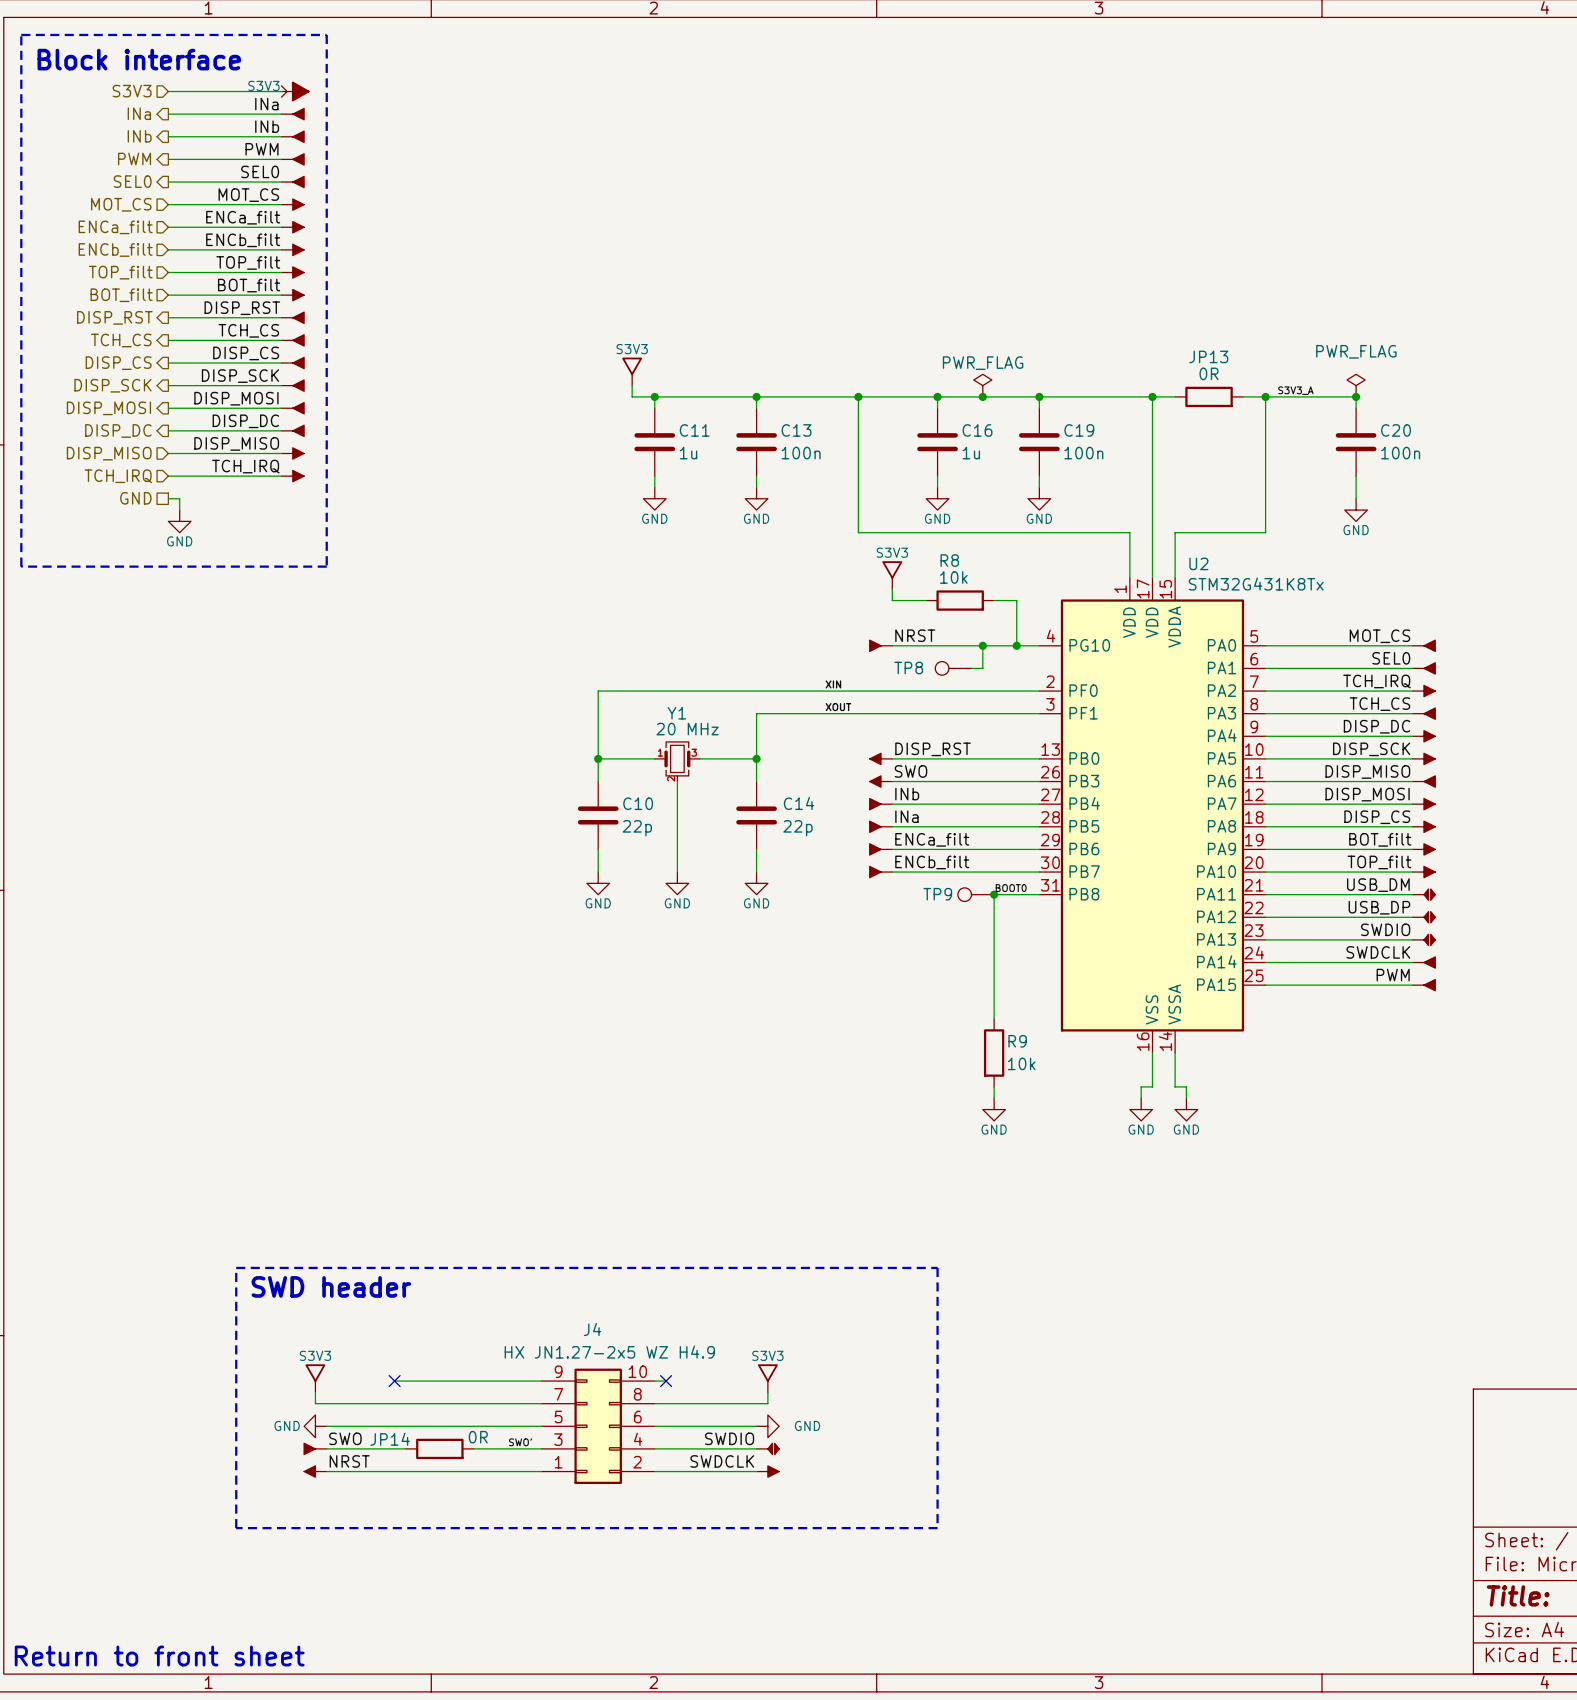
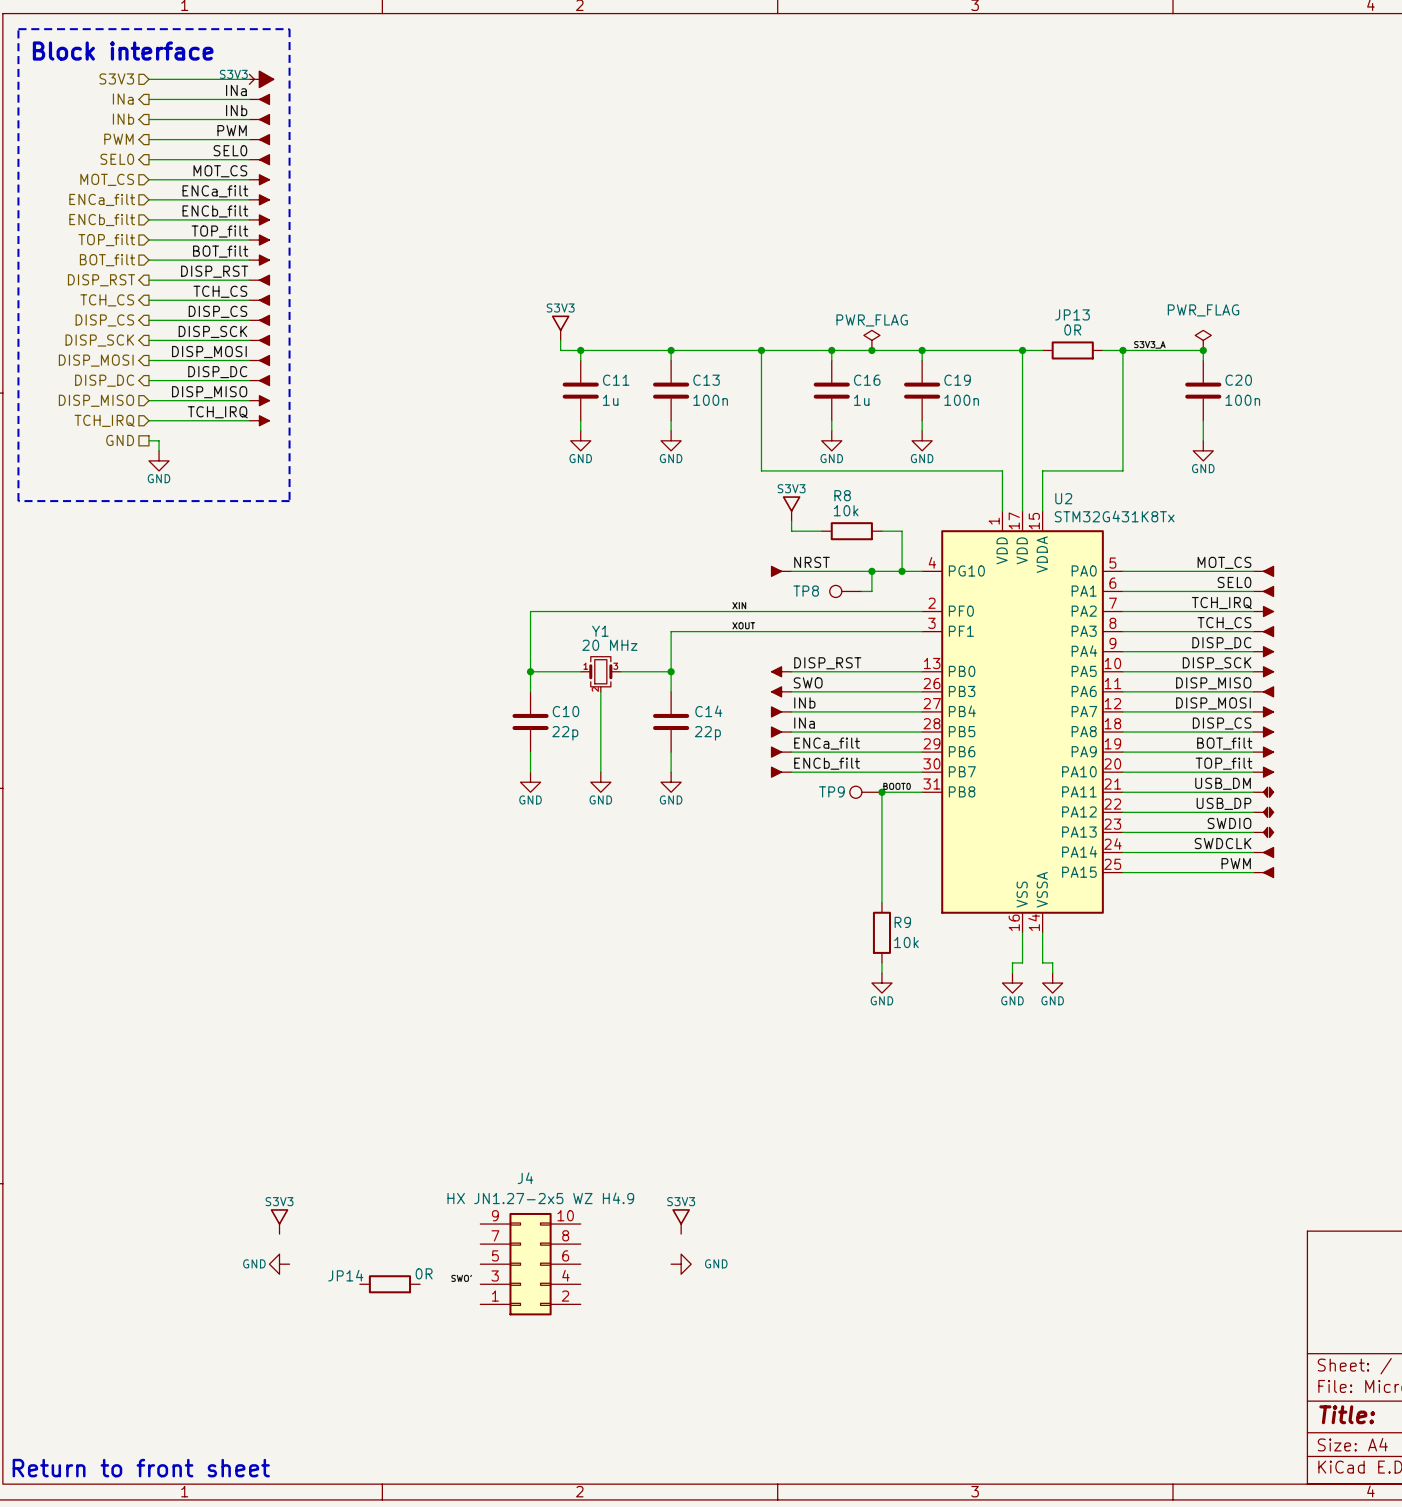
line: (236, 1267) (937, 1267) (937, 1528) (236, 1528) (236, 1267) -> none
text: SWD header (331, 1286) -> none
wire: (394, 1381) (541, 1381) -> none
no-connect mark: (394, 1381) -> none
wire: (654, 1381) (666, 1381) -> none
no-connect mark: (666, 1381) -> none
wire: (315, 1392) (315, 1403) (541, 1403) -> none
wire: (767, 1392) (767, 1403) (654, 1403) -> none
wire: (326, 1426) (541, 1426) -> none
wire: (654, 1426) (756, 1426) -> none
label: SWO (345, 1438) -> none
label: SWDIO (729, 1438) -> none
part: (315, 1448) -> none
wire: (326, 1448) (405, 1448) -> none
wire: (473, 1448) (541, 1448) -> none
wire: (654, 1448) (756, 1448) -> none
part: (767, 1448) -> none
label: NRST (349, 1461) -> none
label: SWDCLK (722, 1461) -> none
part: (315, 1471) -> none
wire: (326, 1471) (541, 1471) -> none
wire: (654, 1471) (756, 1471) -> none
part: (767, 1471) -> none

